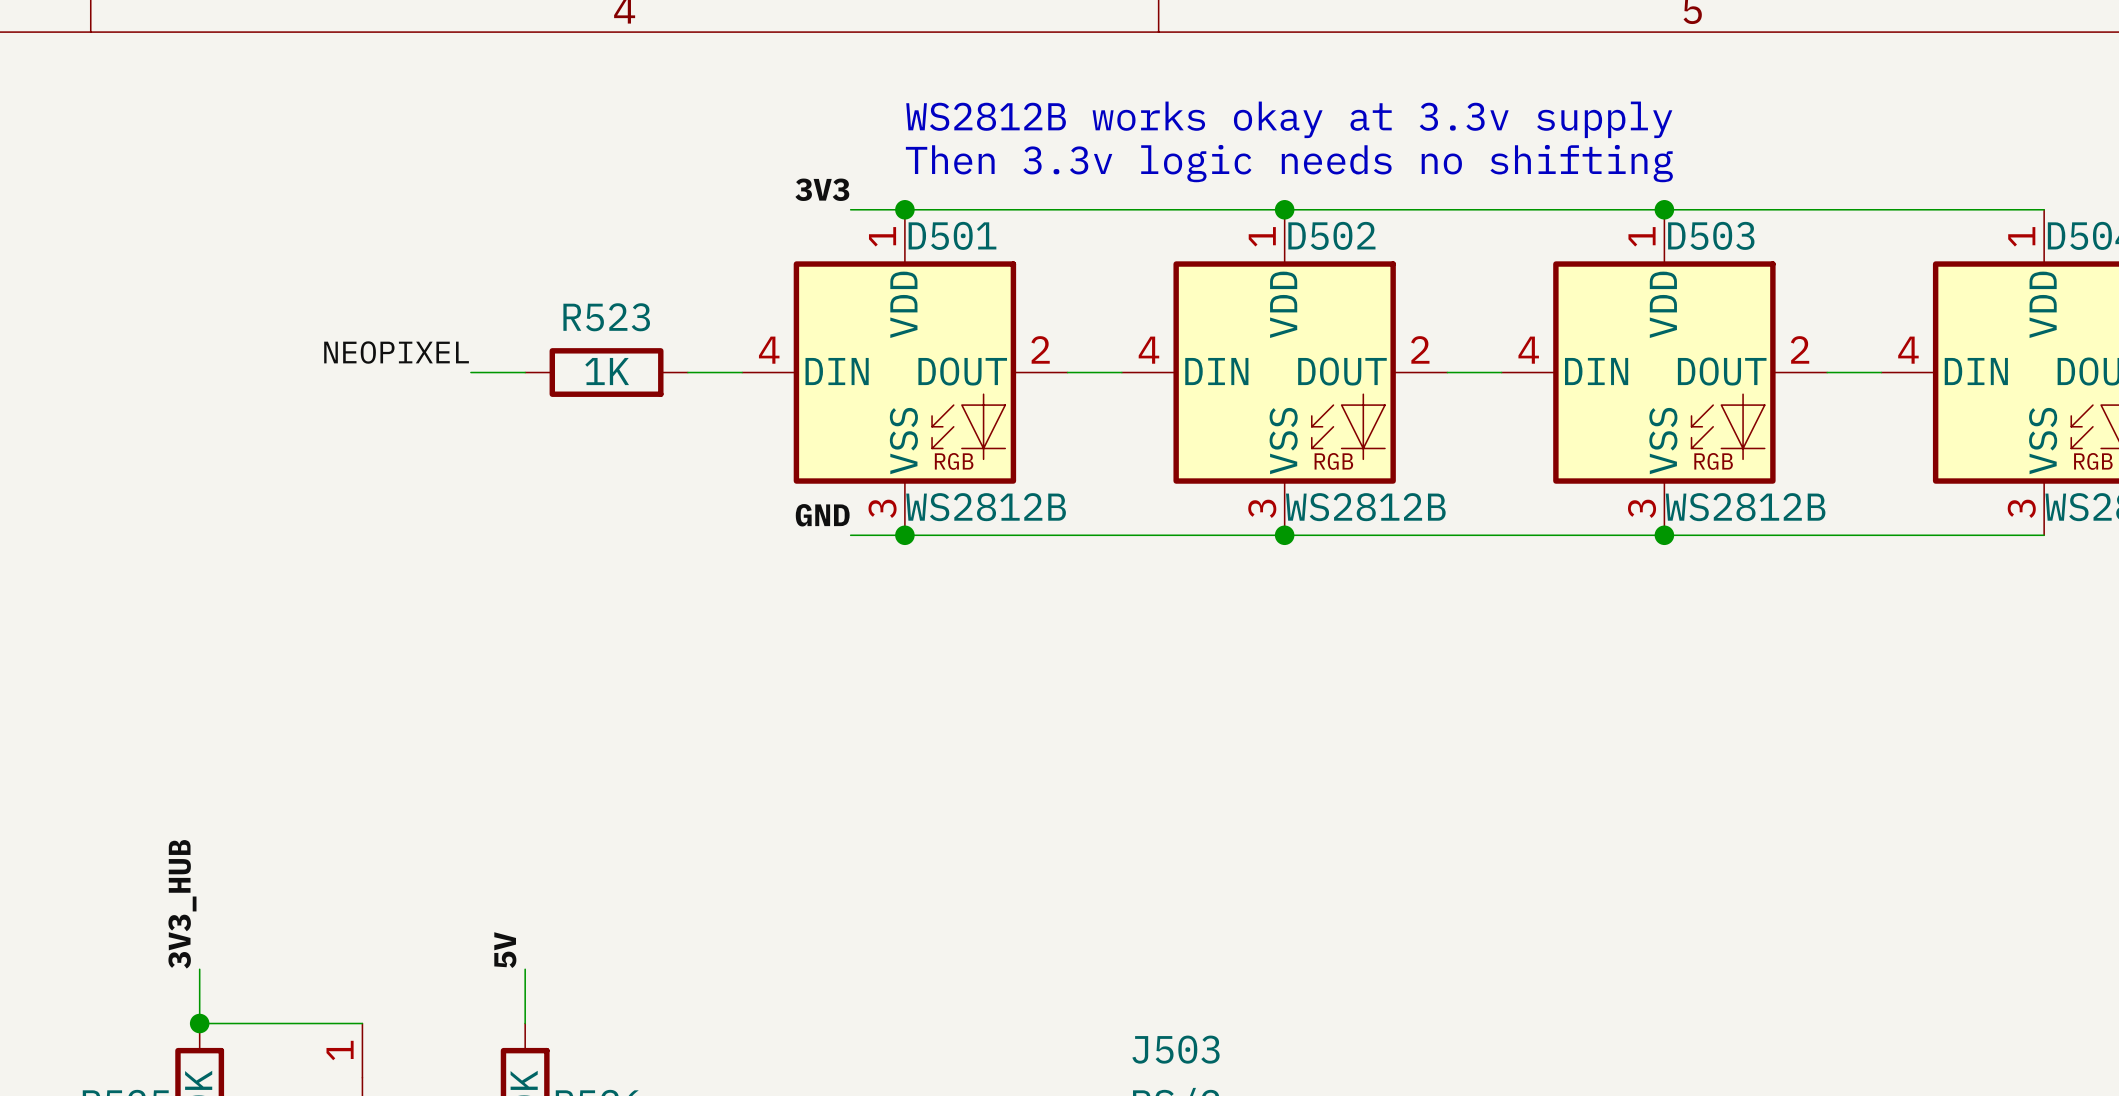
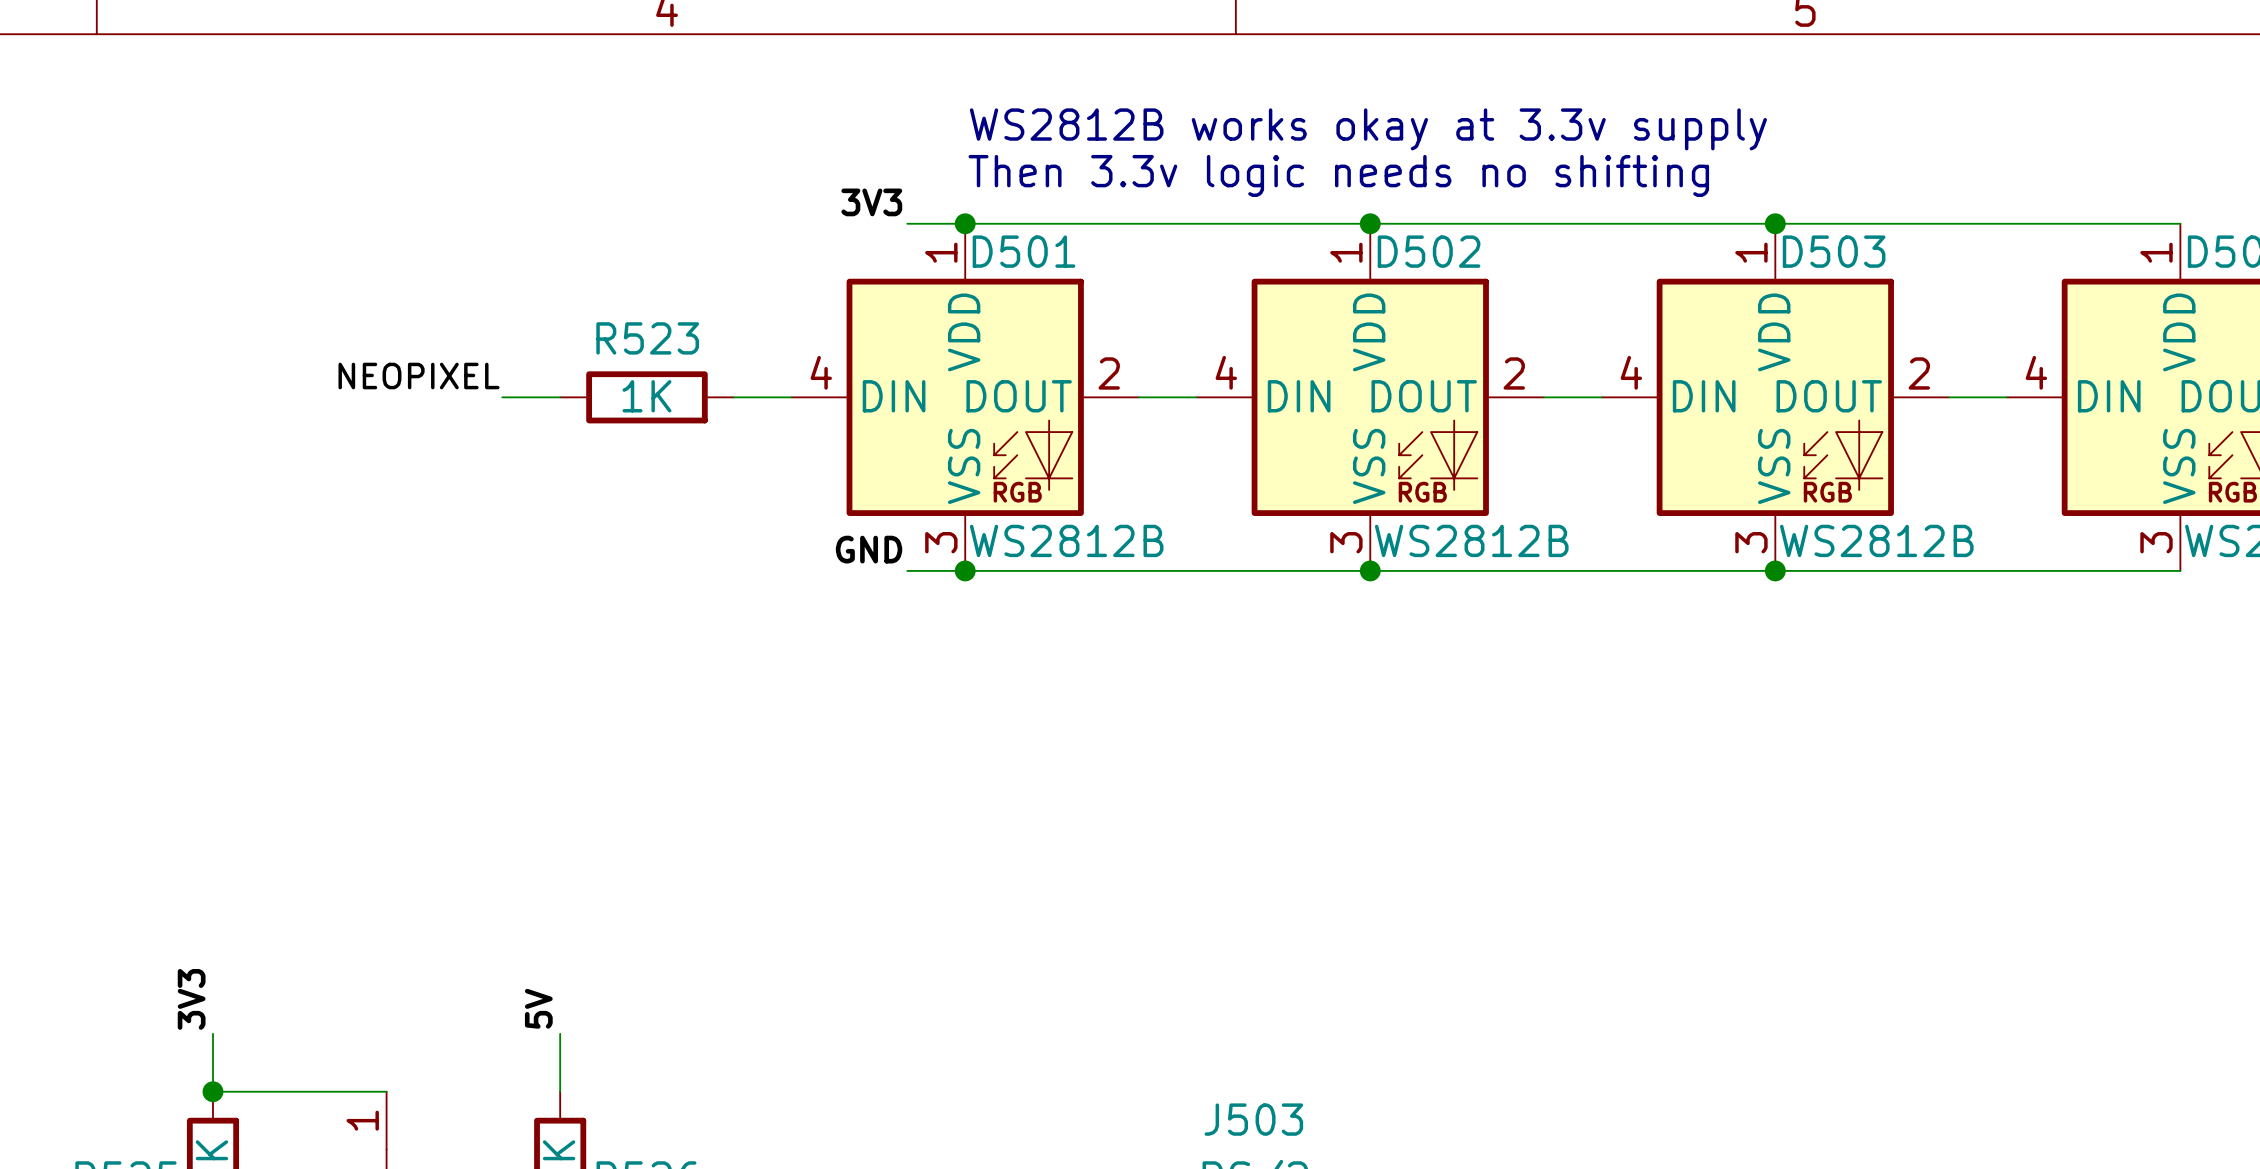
label: 3V3_HUB (182, 904) -> 3V3 (191, 999)

